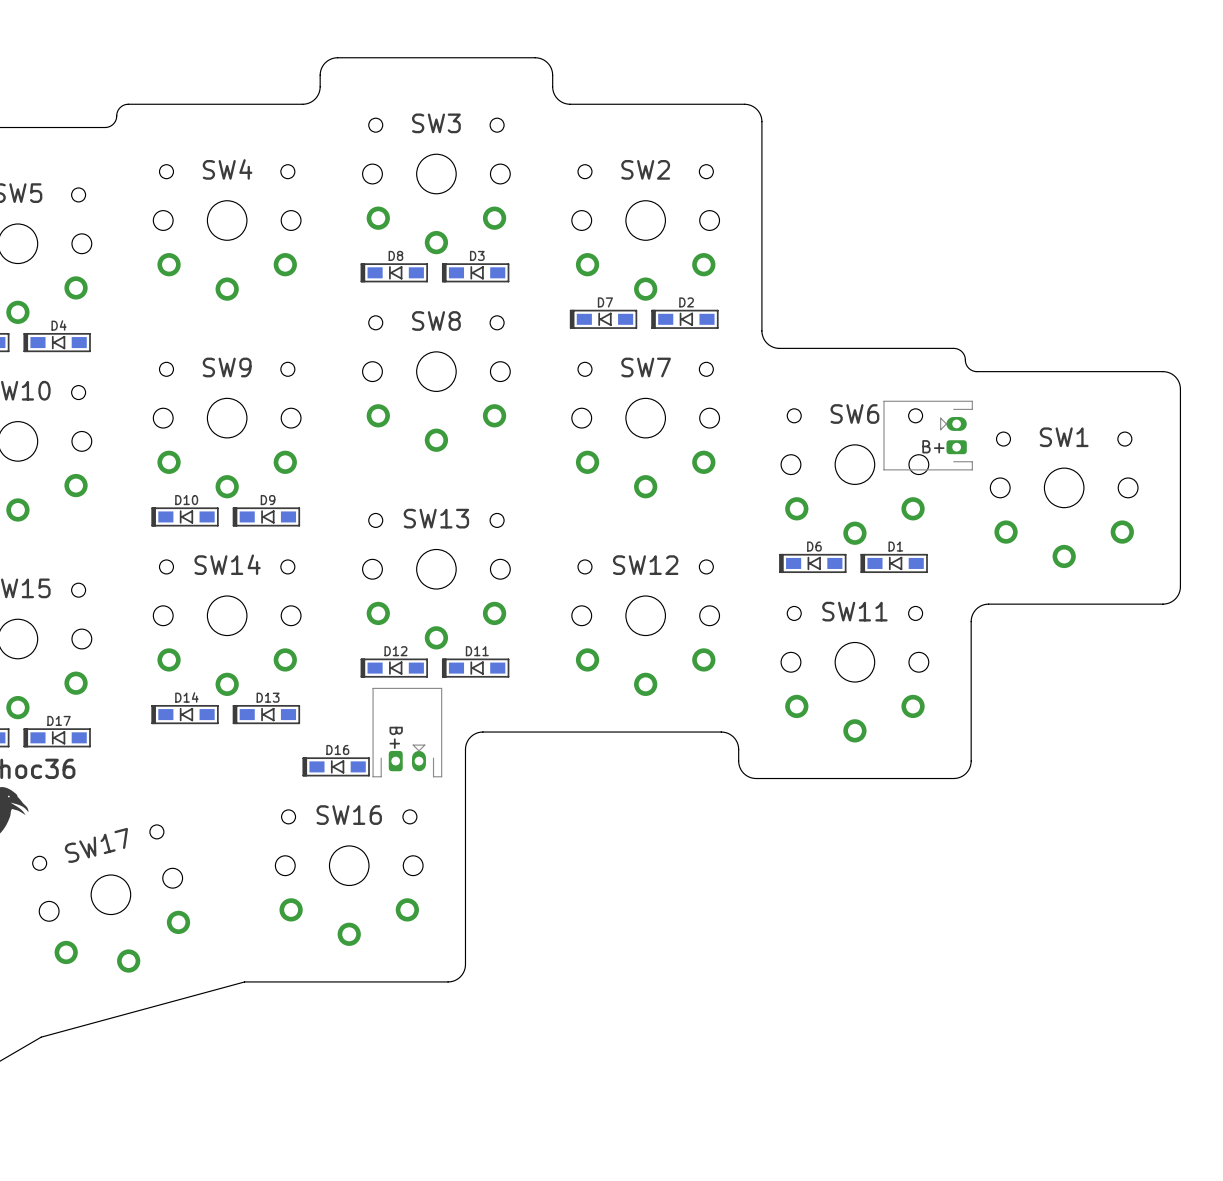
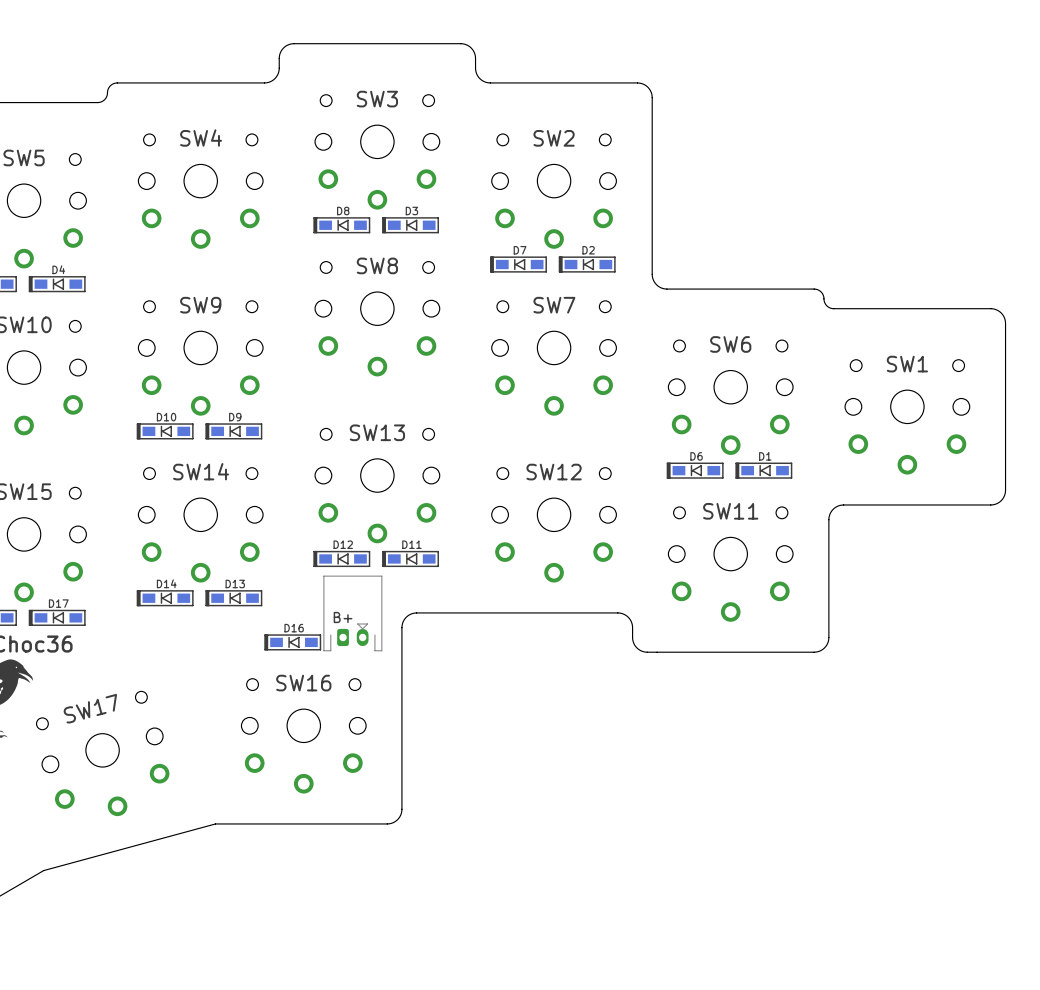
part: (928, 435) -> none
text: none -> B+ (343, 617)
part text: B+ (396, 737) -> none

